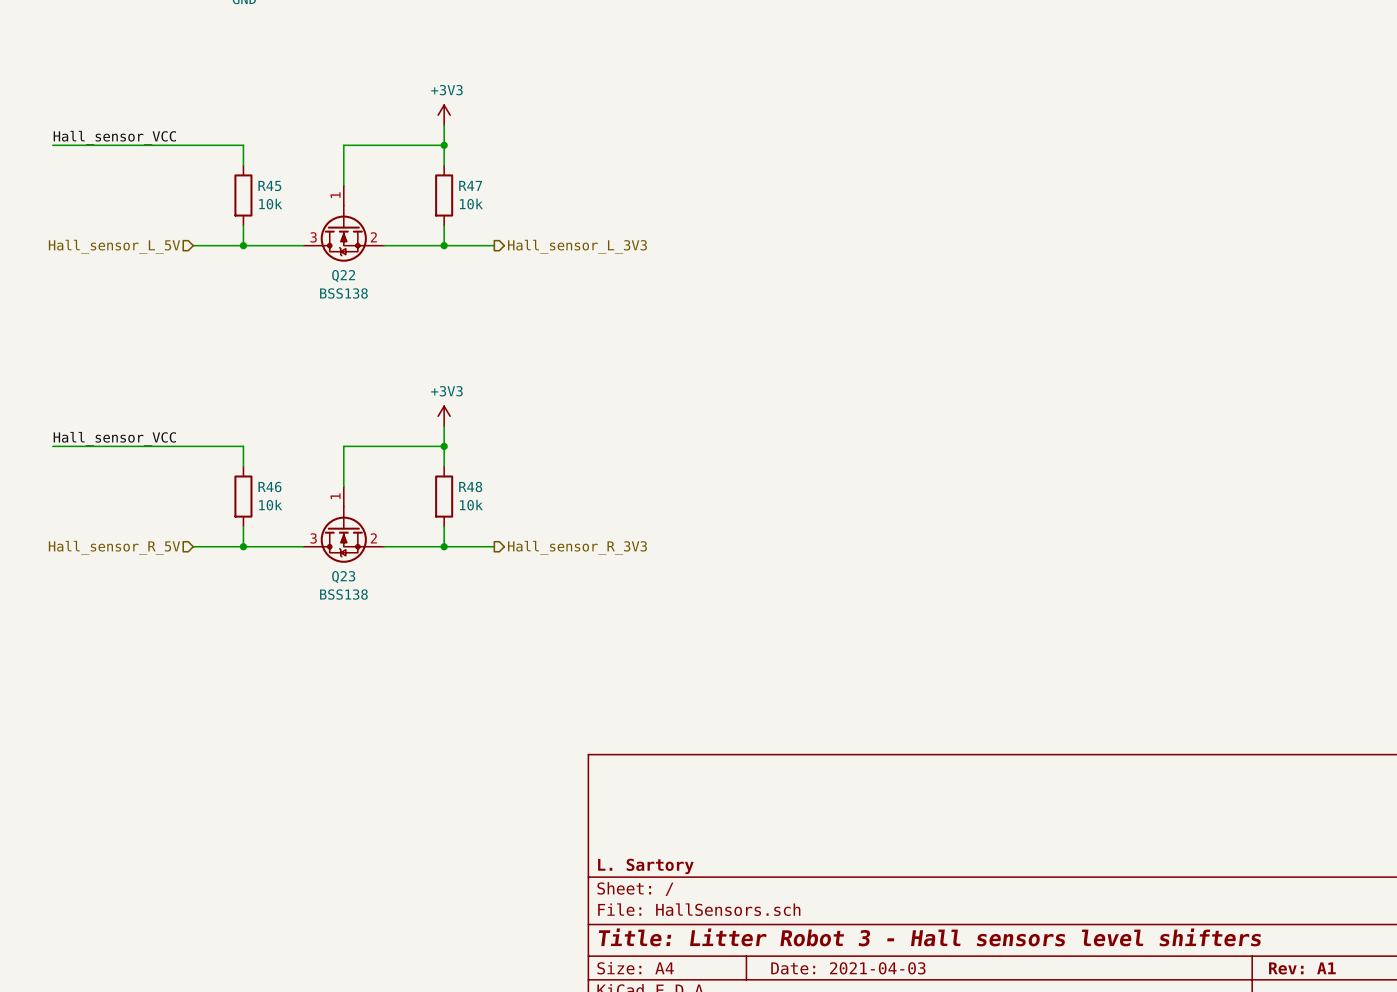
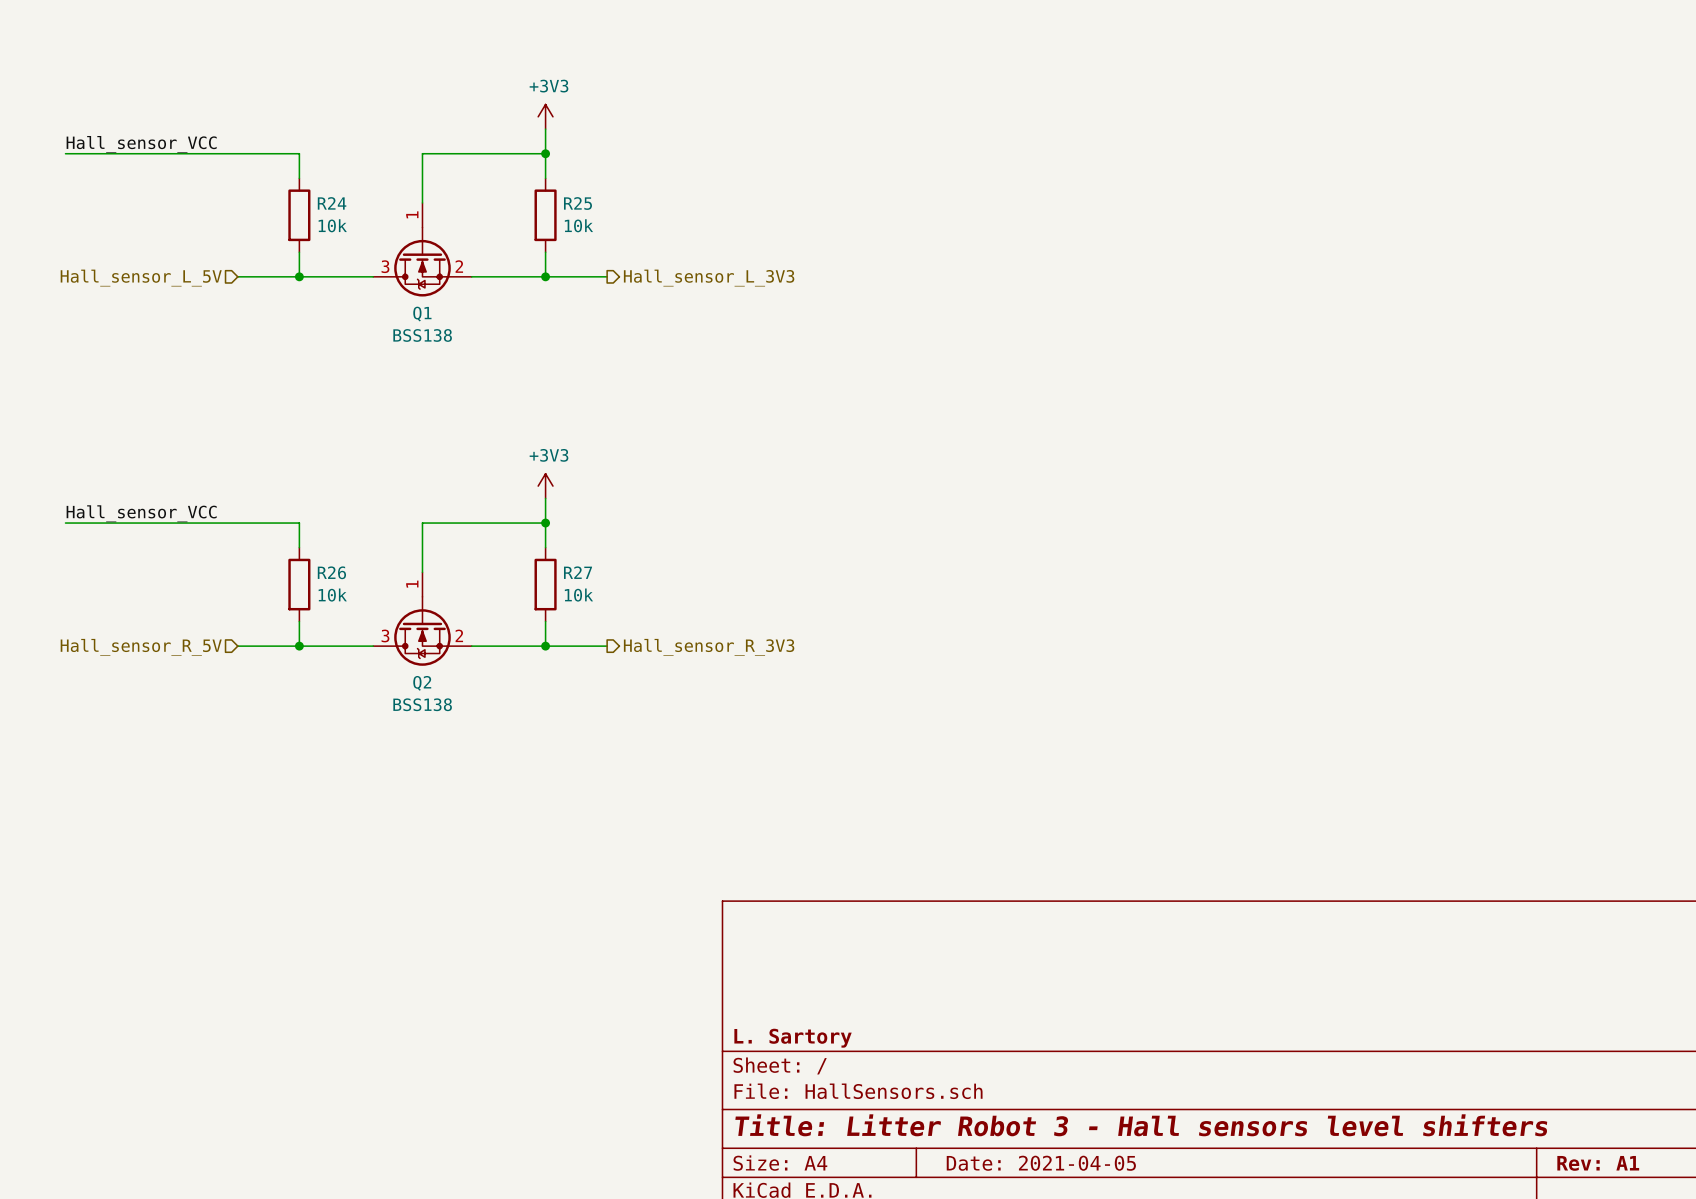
R45 name: R45 (269, 185) -> R24 (332, 203)
R47 name: R47 (470, 185) -> R25 (577, 203)
Q22 name: Q22 (343, 276) -> Q1 (422, 314)
R46 name: R46 (269, 486) -> R26 (331, 572)
R48 name: R48 (470, 486) -> R27 (578, 572)
Q23 name: Q23 (343, 577) -> Q2 (422, 683)
title block: Date: 2021-04-03 (848, 968) -> Date: 2021-04-05 (1041, 1163)

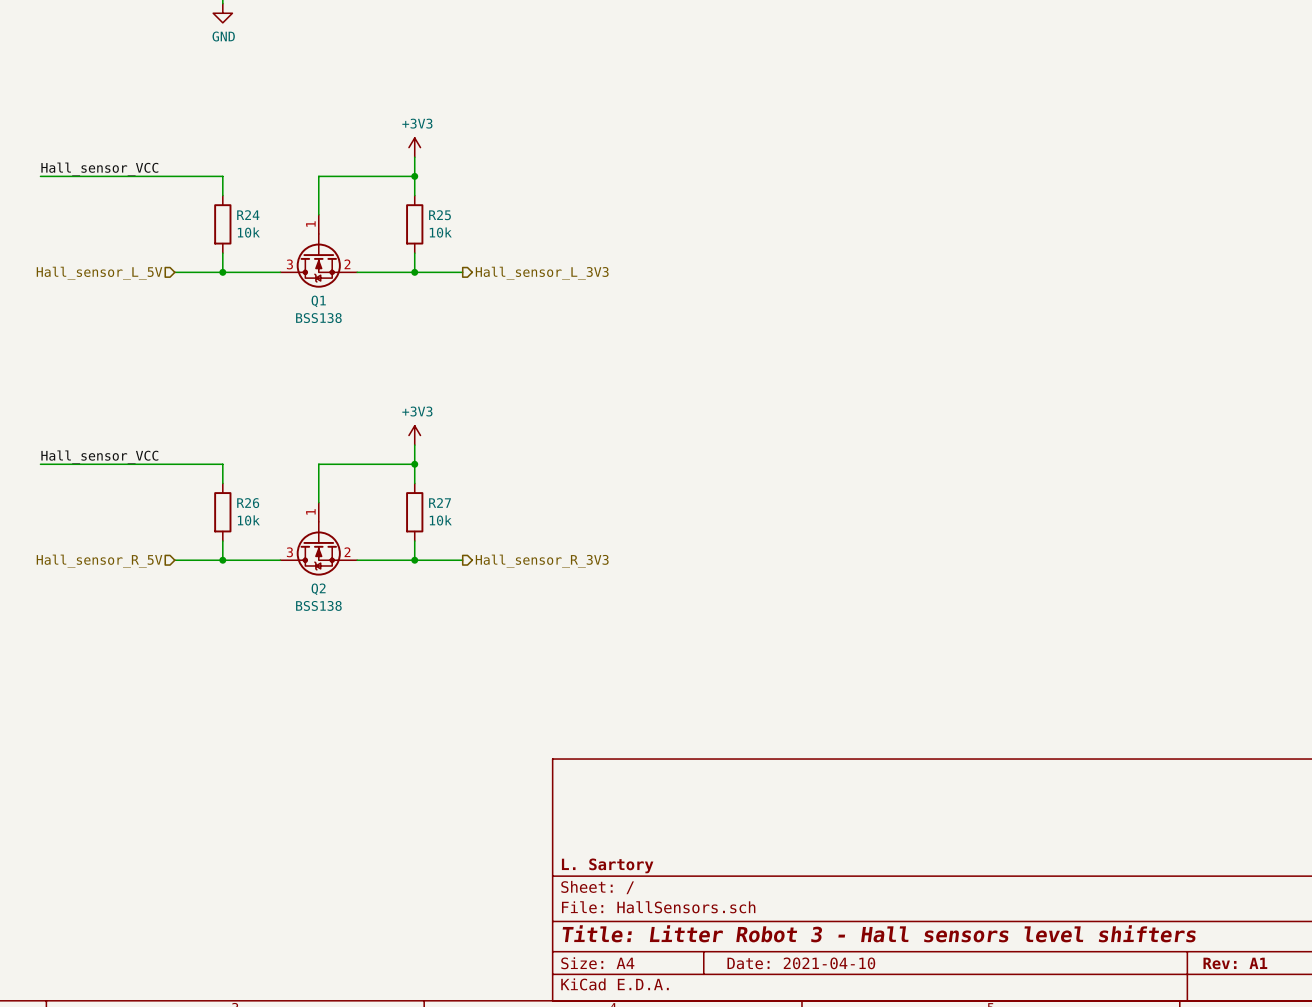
title block: Date: 2021-04-05 (1041, 1163) -> Date: 2021-04-10 (801, 963)

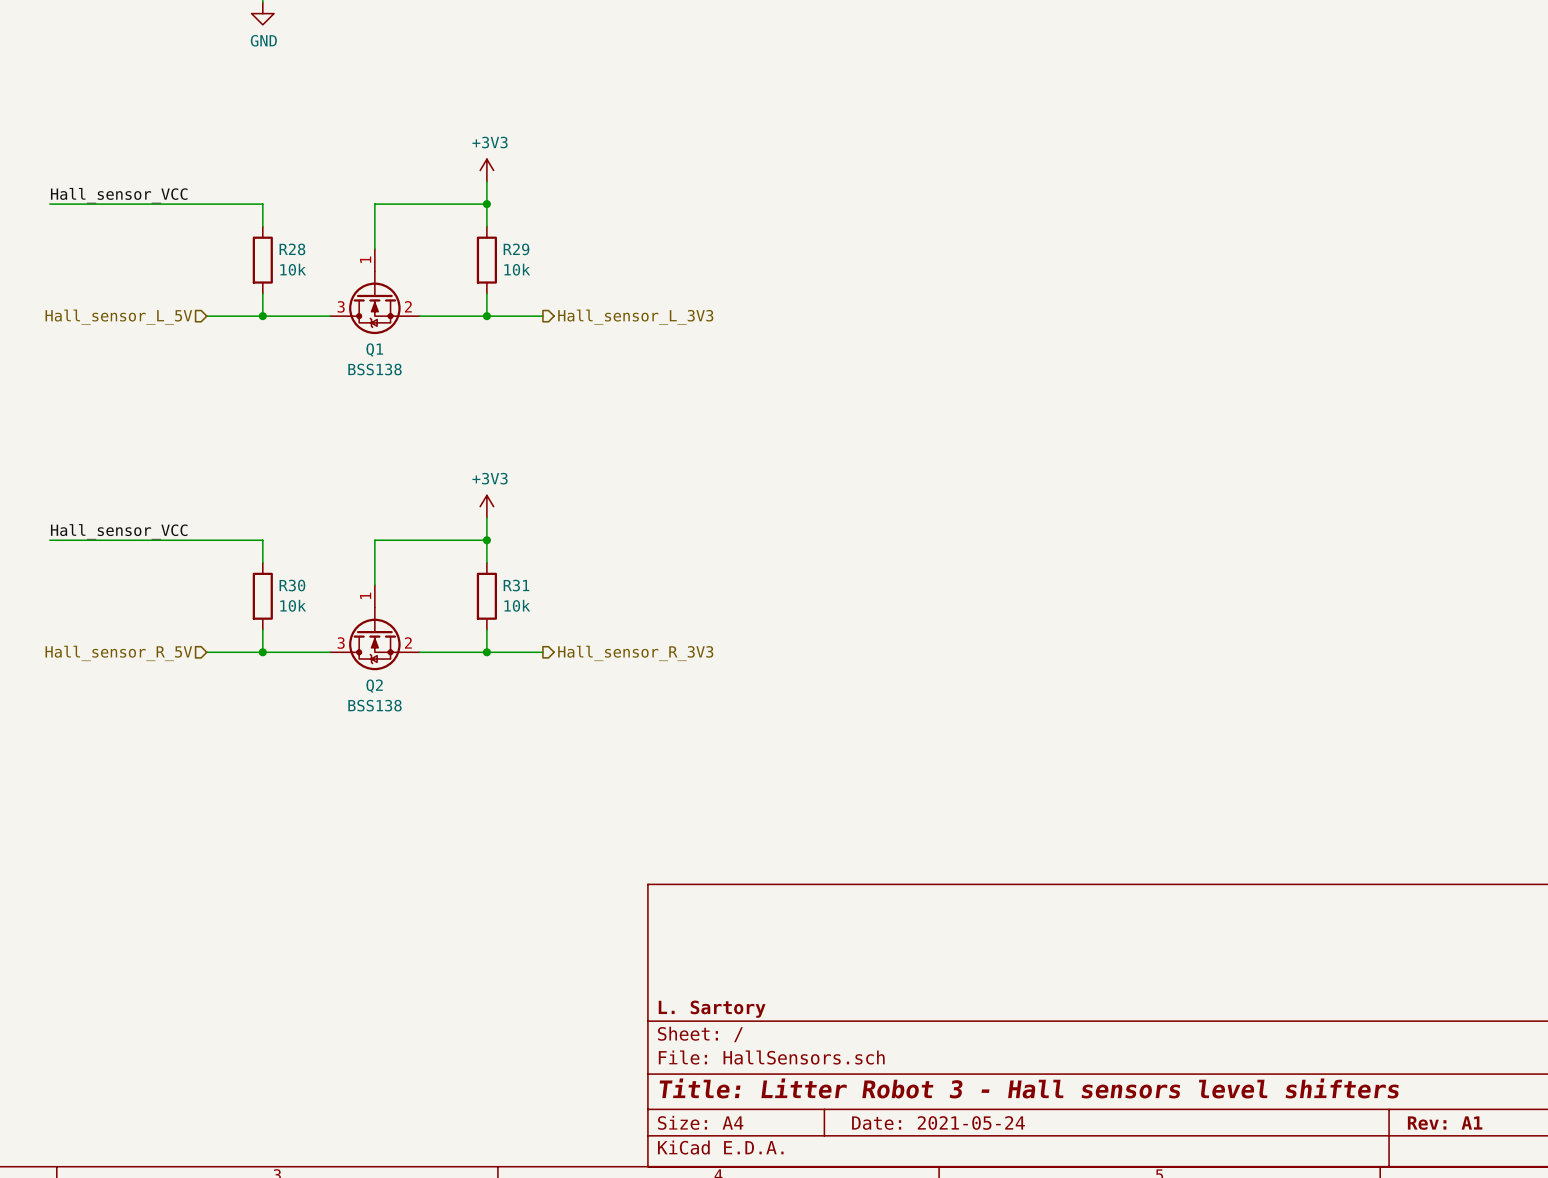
R24 name: R24 (248, 215) -> R28 (292, 249)
R25 name: R25 (439, 215) -> R29 (516, 249)
R27 name: R27 (440, 502) -> R31 (516, 585)
R26 name: R26 (248, 503) -> R30 (292, 585)
title block: Date: 2021-04-10 (801, 963) -> Date: 2021-05-24 (938, 1123)

